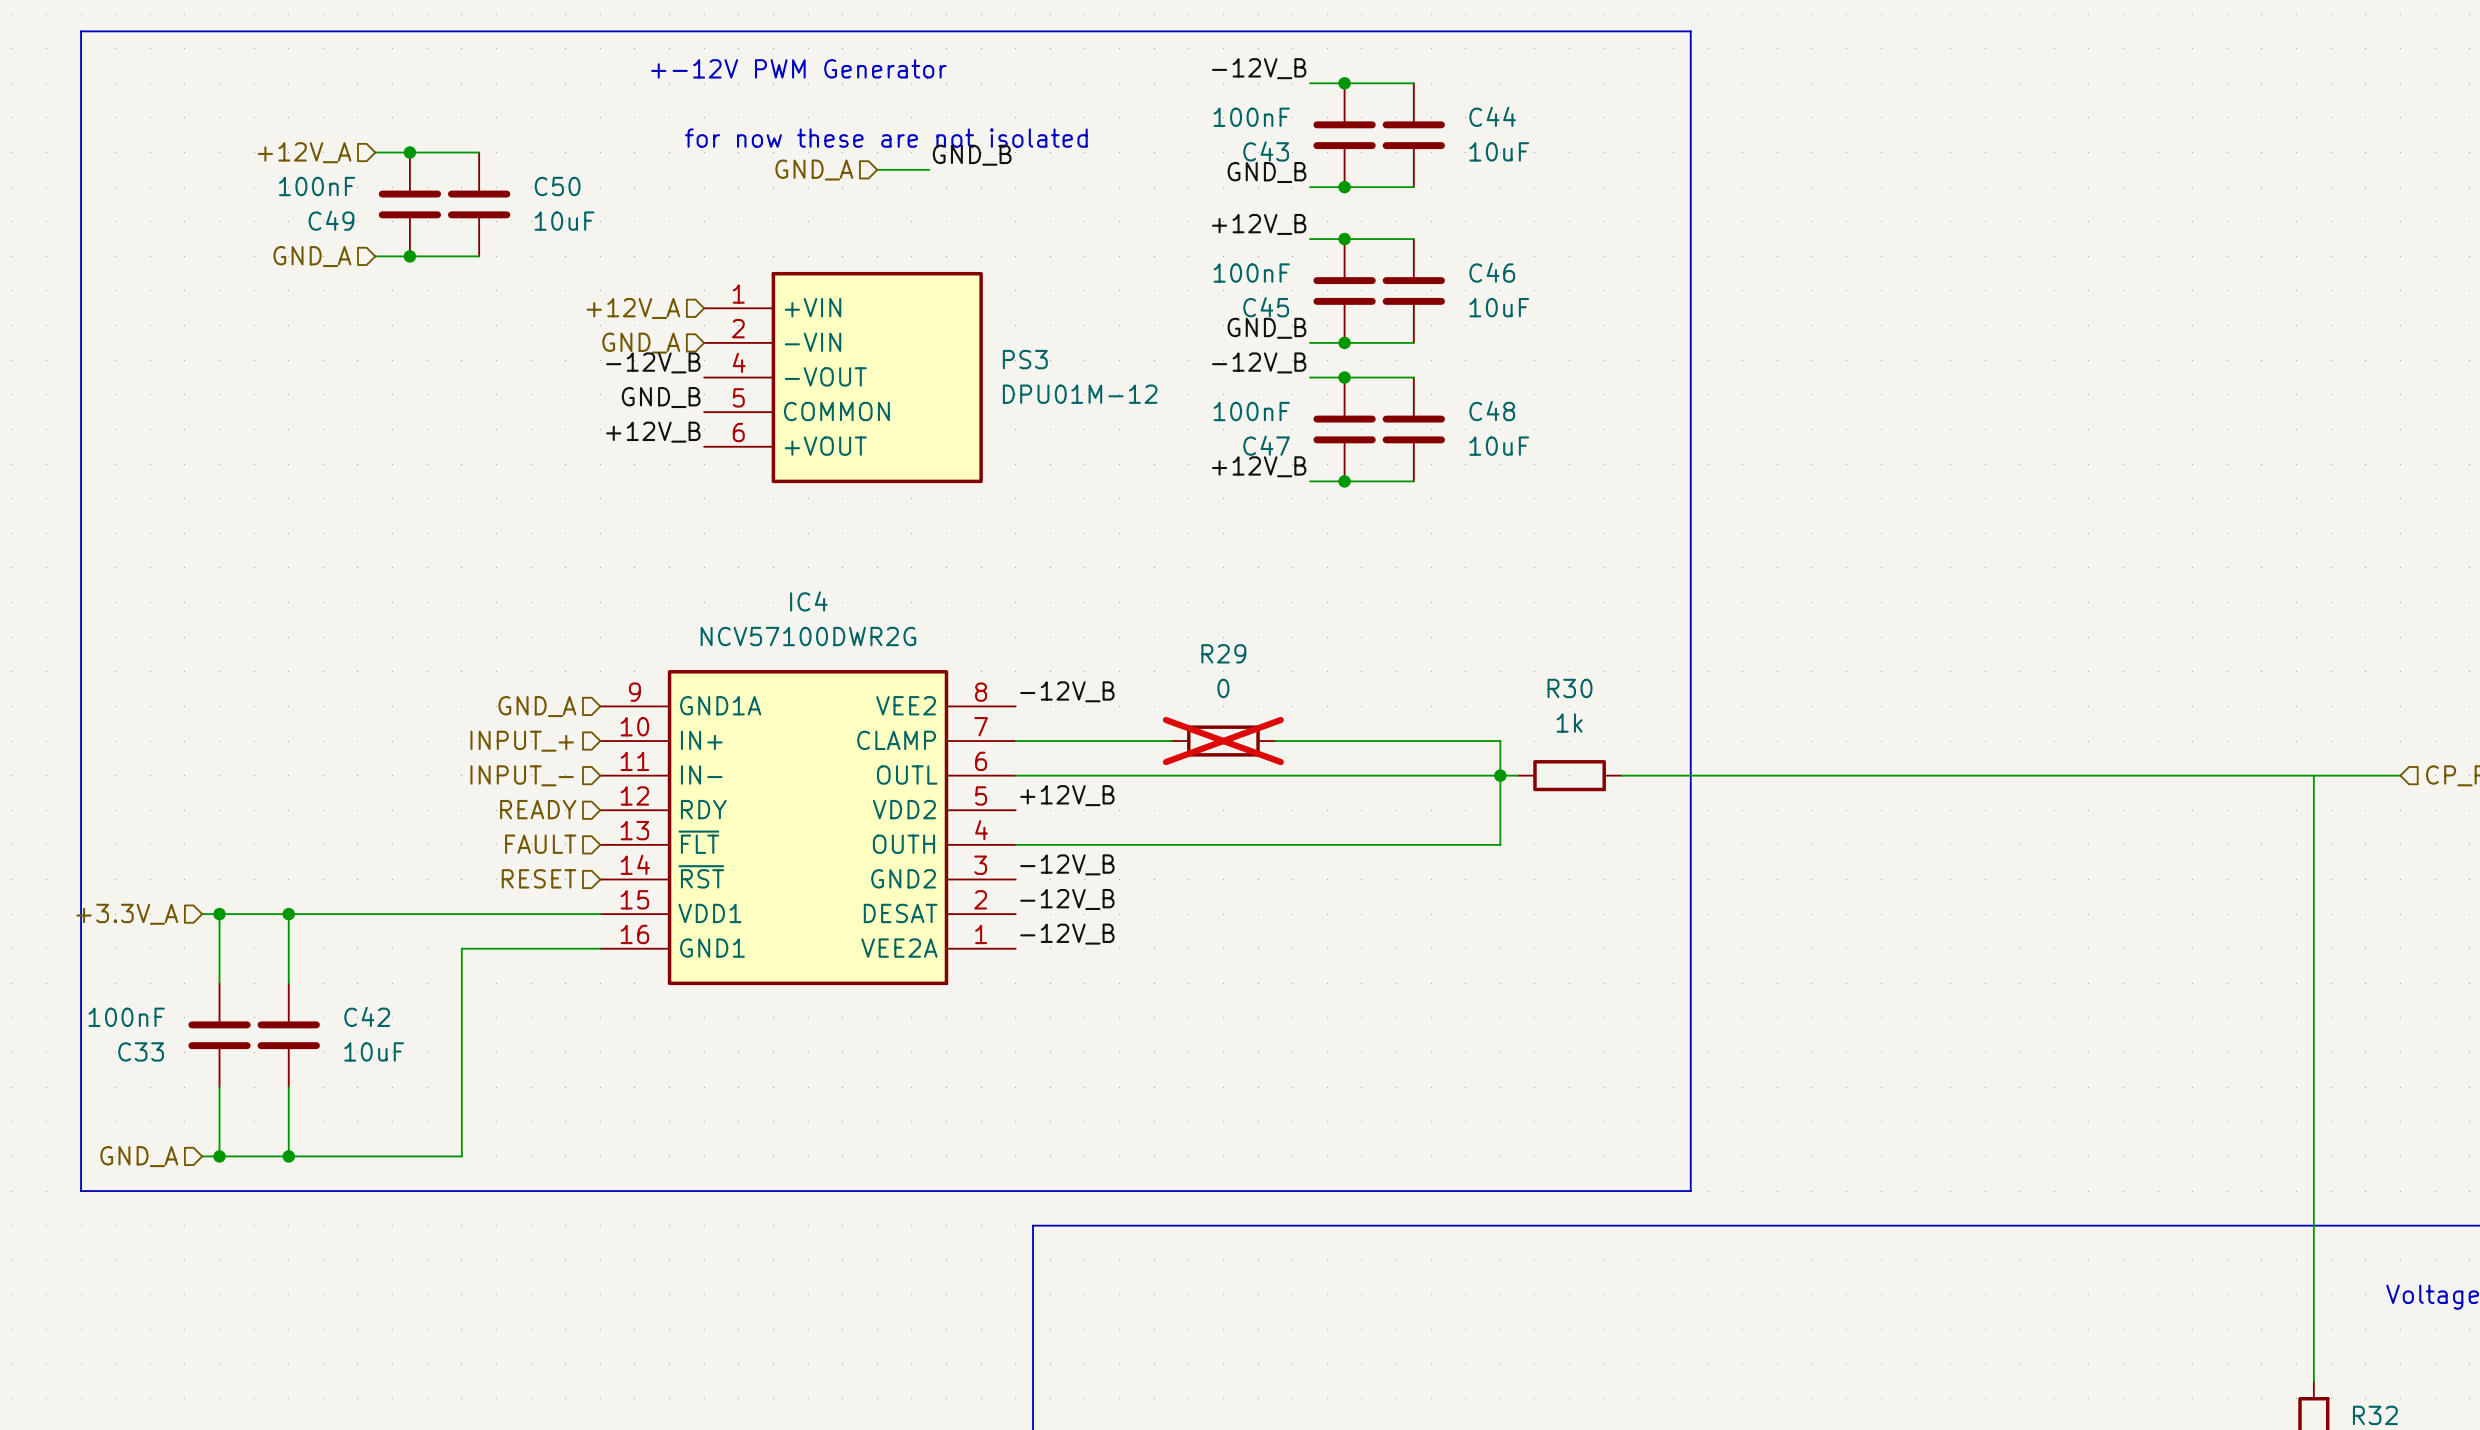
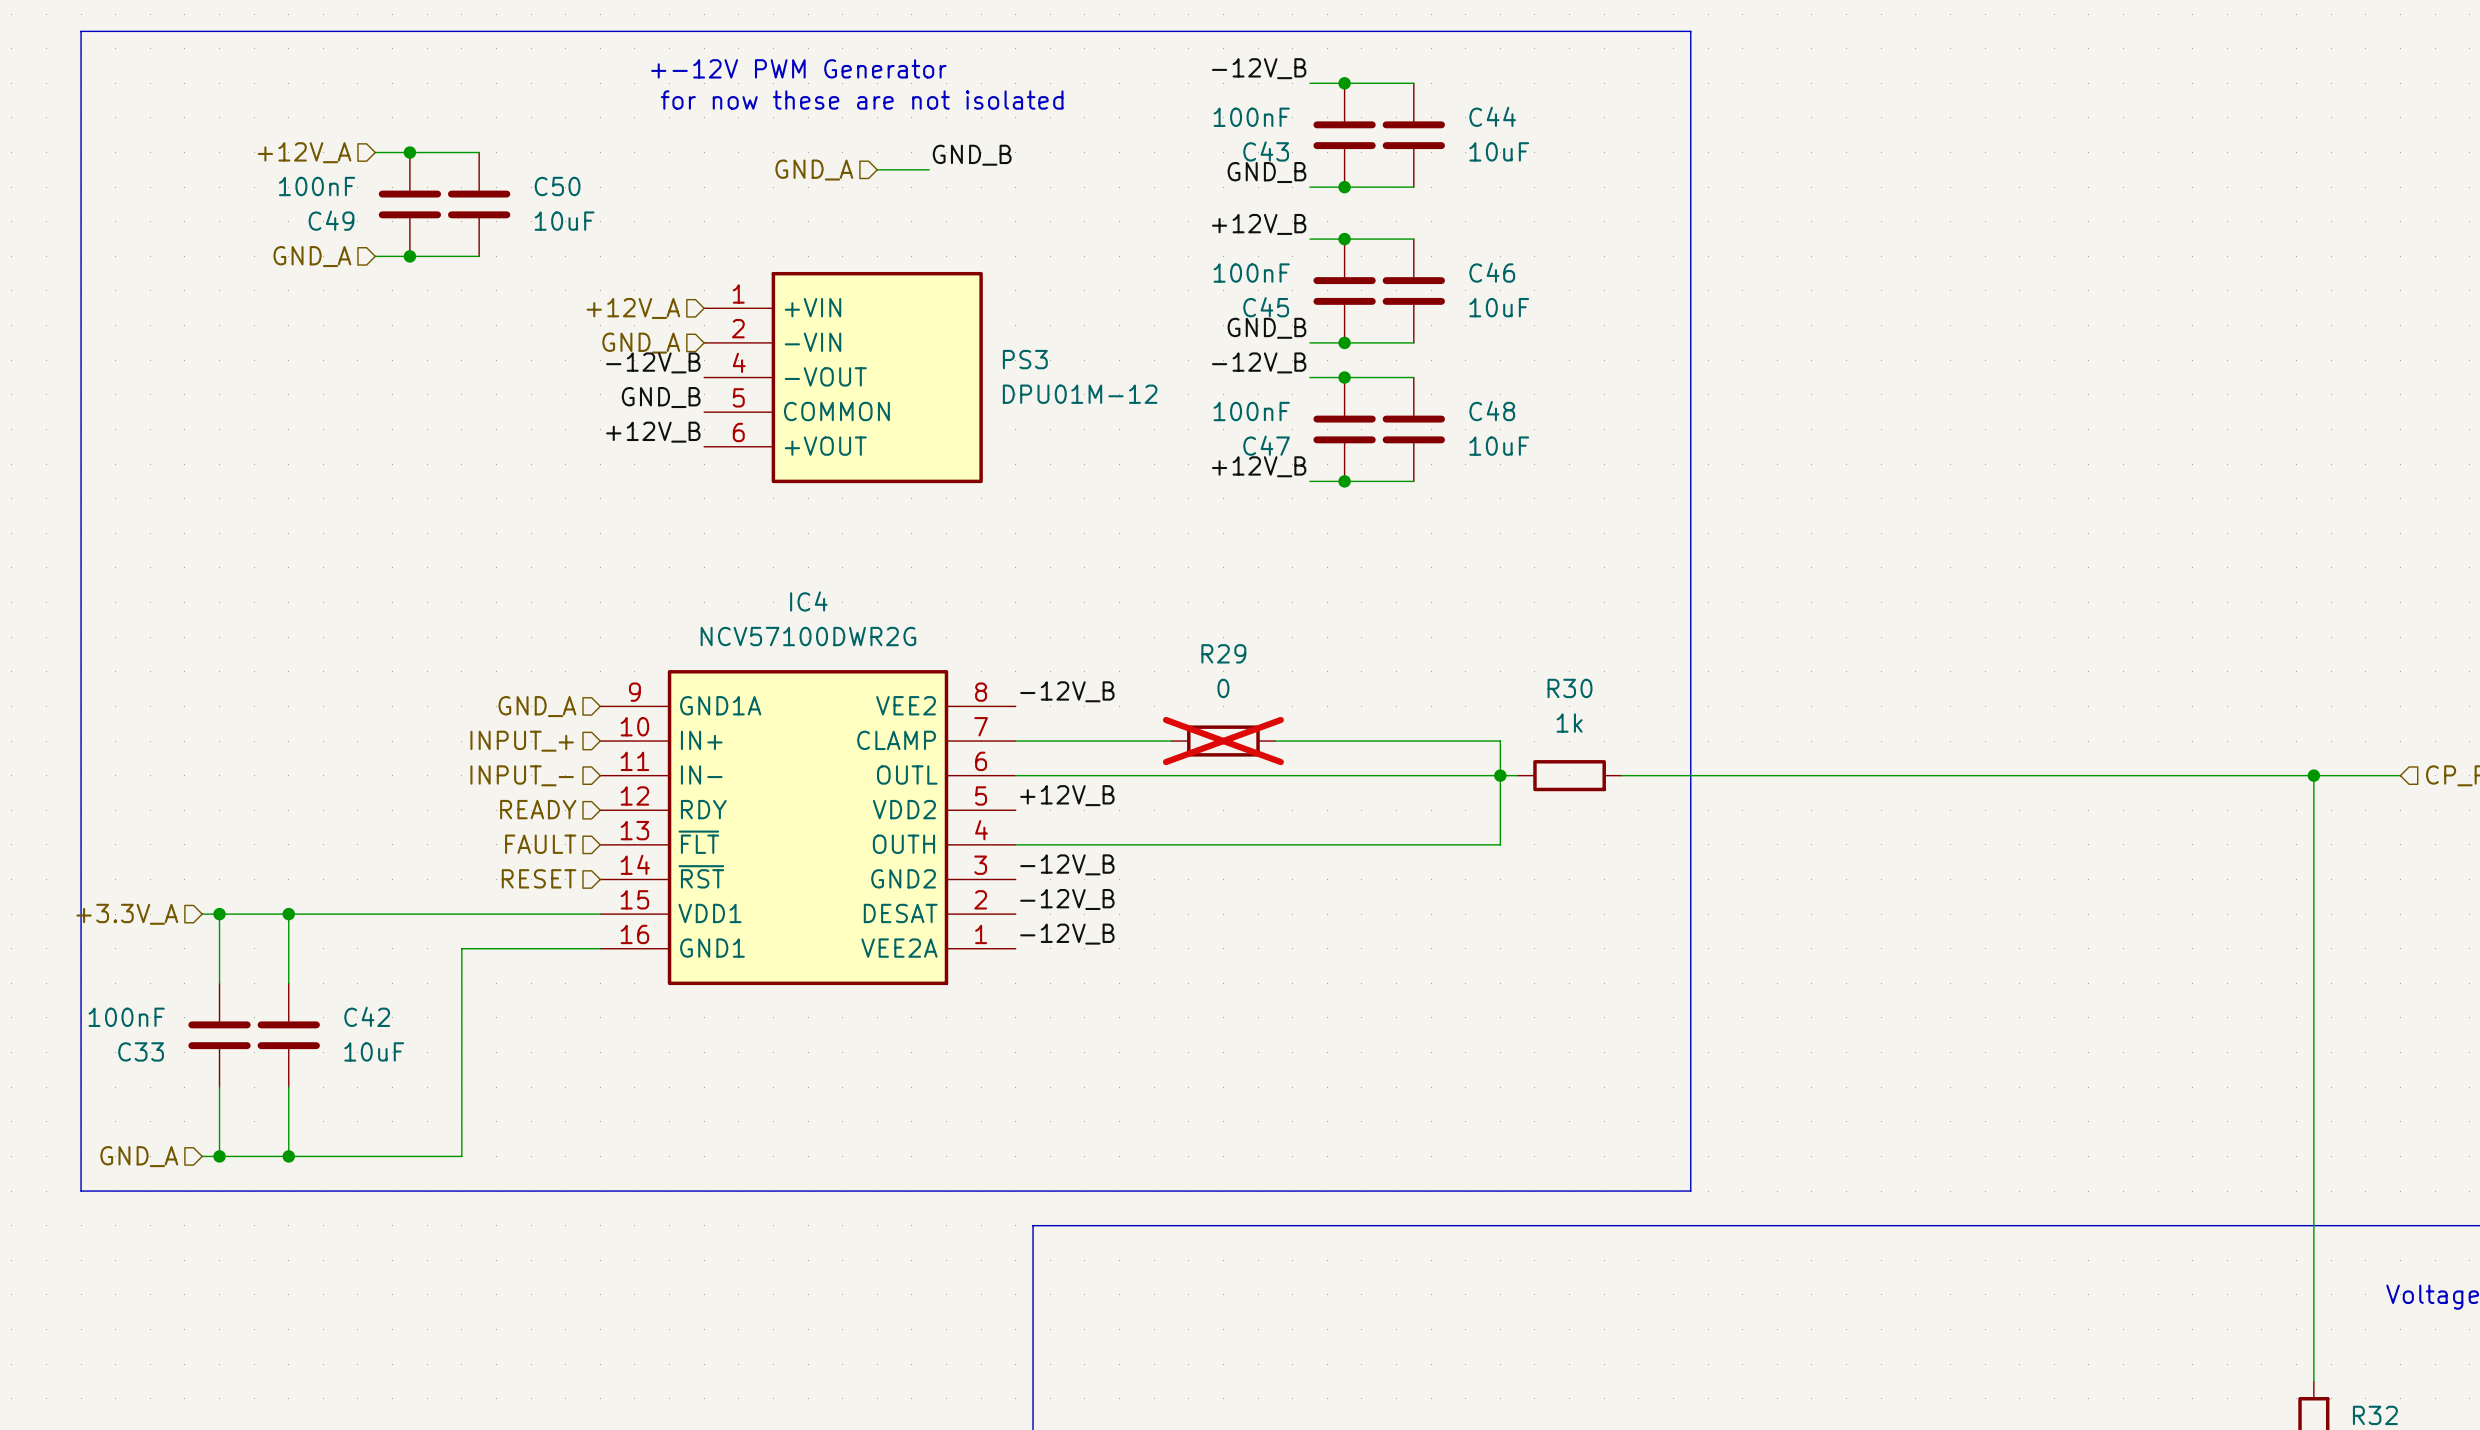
text position: for now these are not isolated (886, 138) -> for now these are not isolated (862, 100)
junction: none -> (2313, 775)

